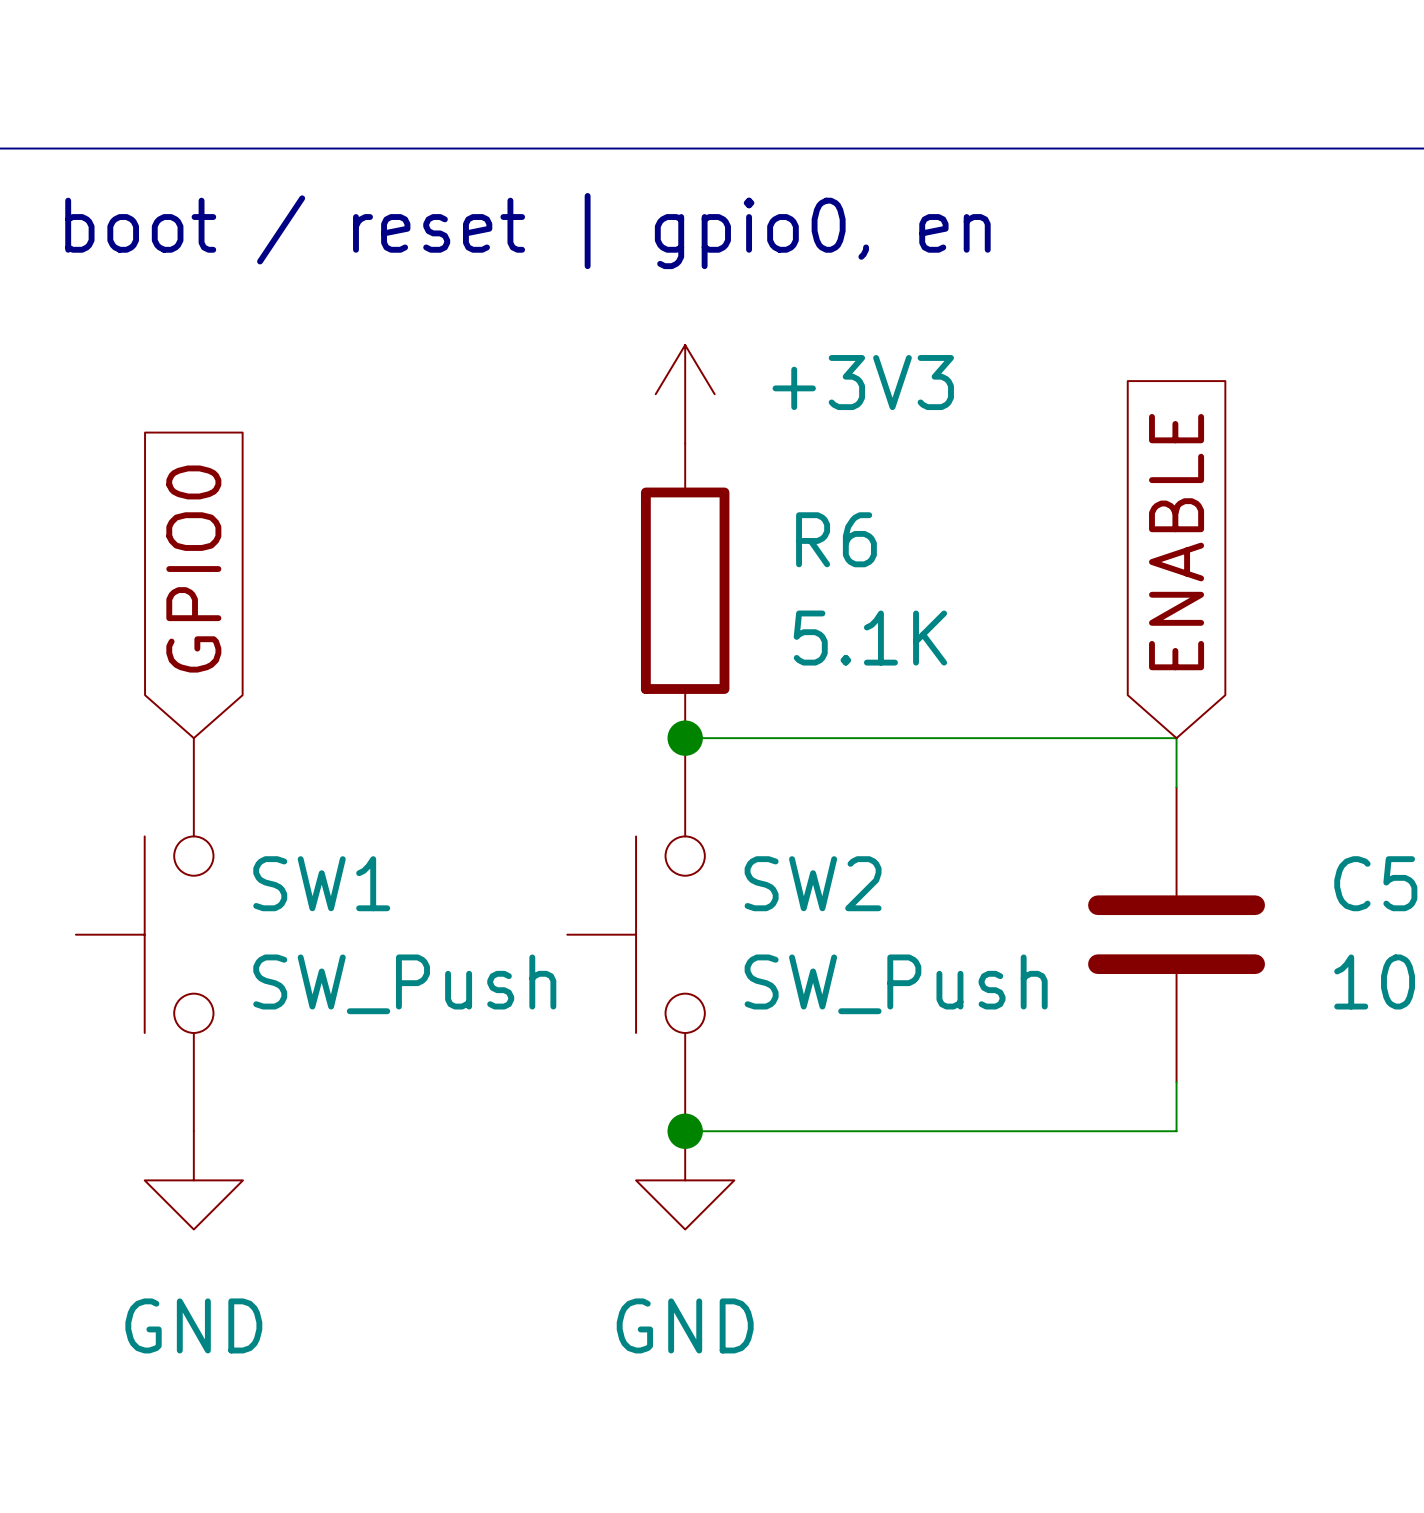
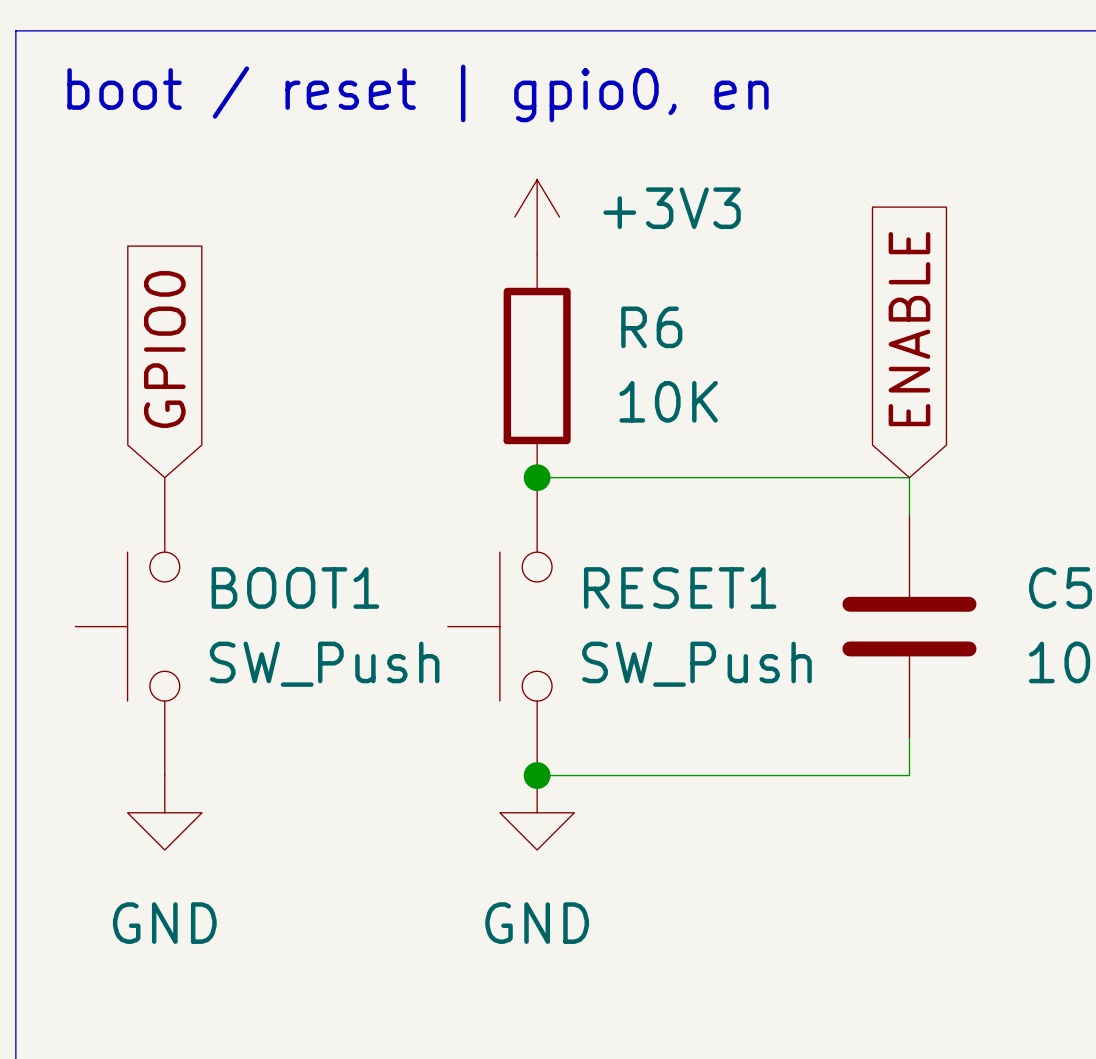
R6 value: 5.1K (870, 638) -> 10K (668, 401)
SW1 name: SW1 (321, 883) -> BOOT1 (295, 587)
SW2 name: SW2 (813, 883) -> RESET1 (680, 587)

